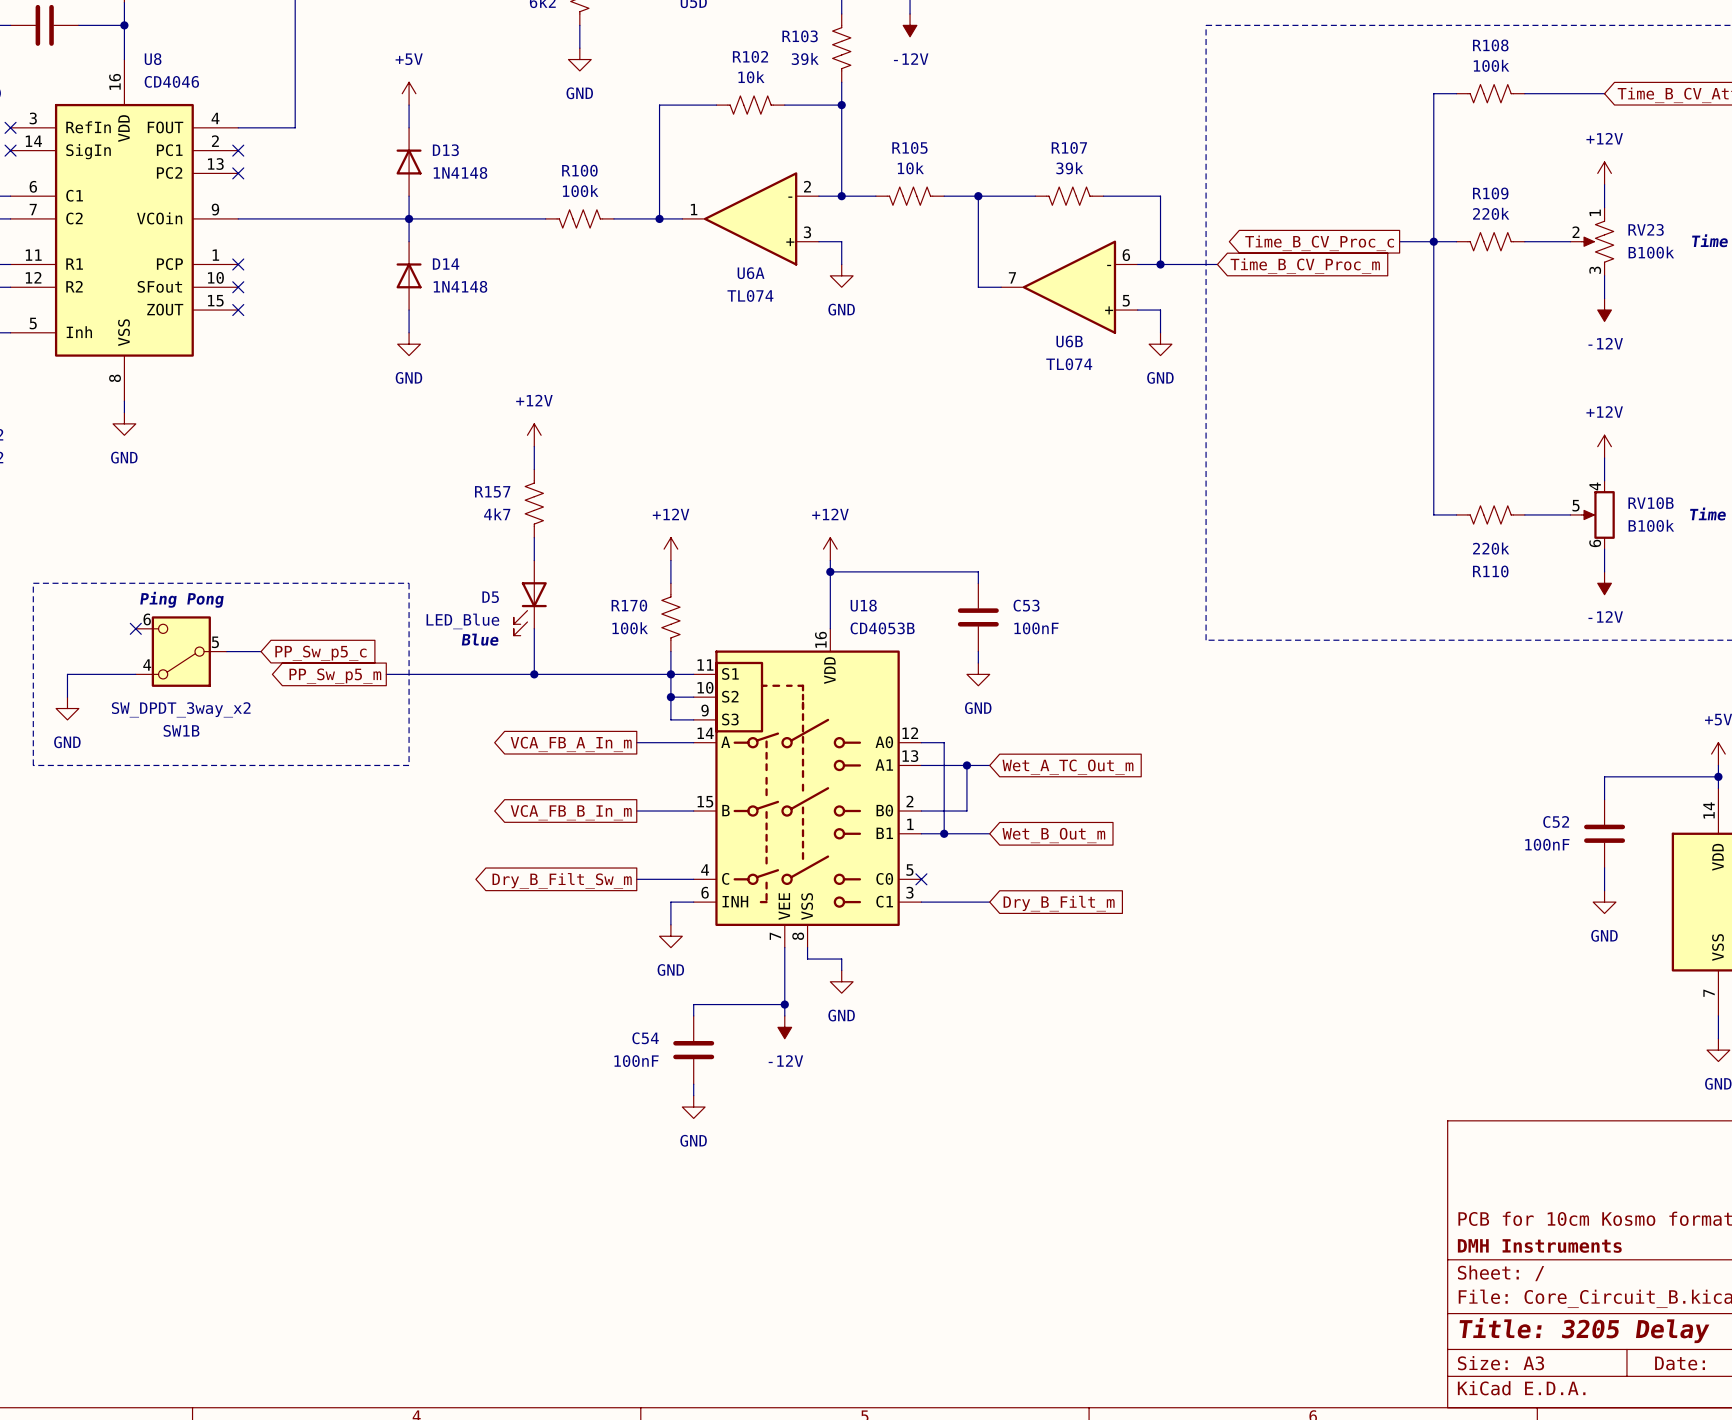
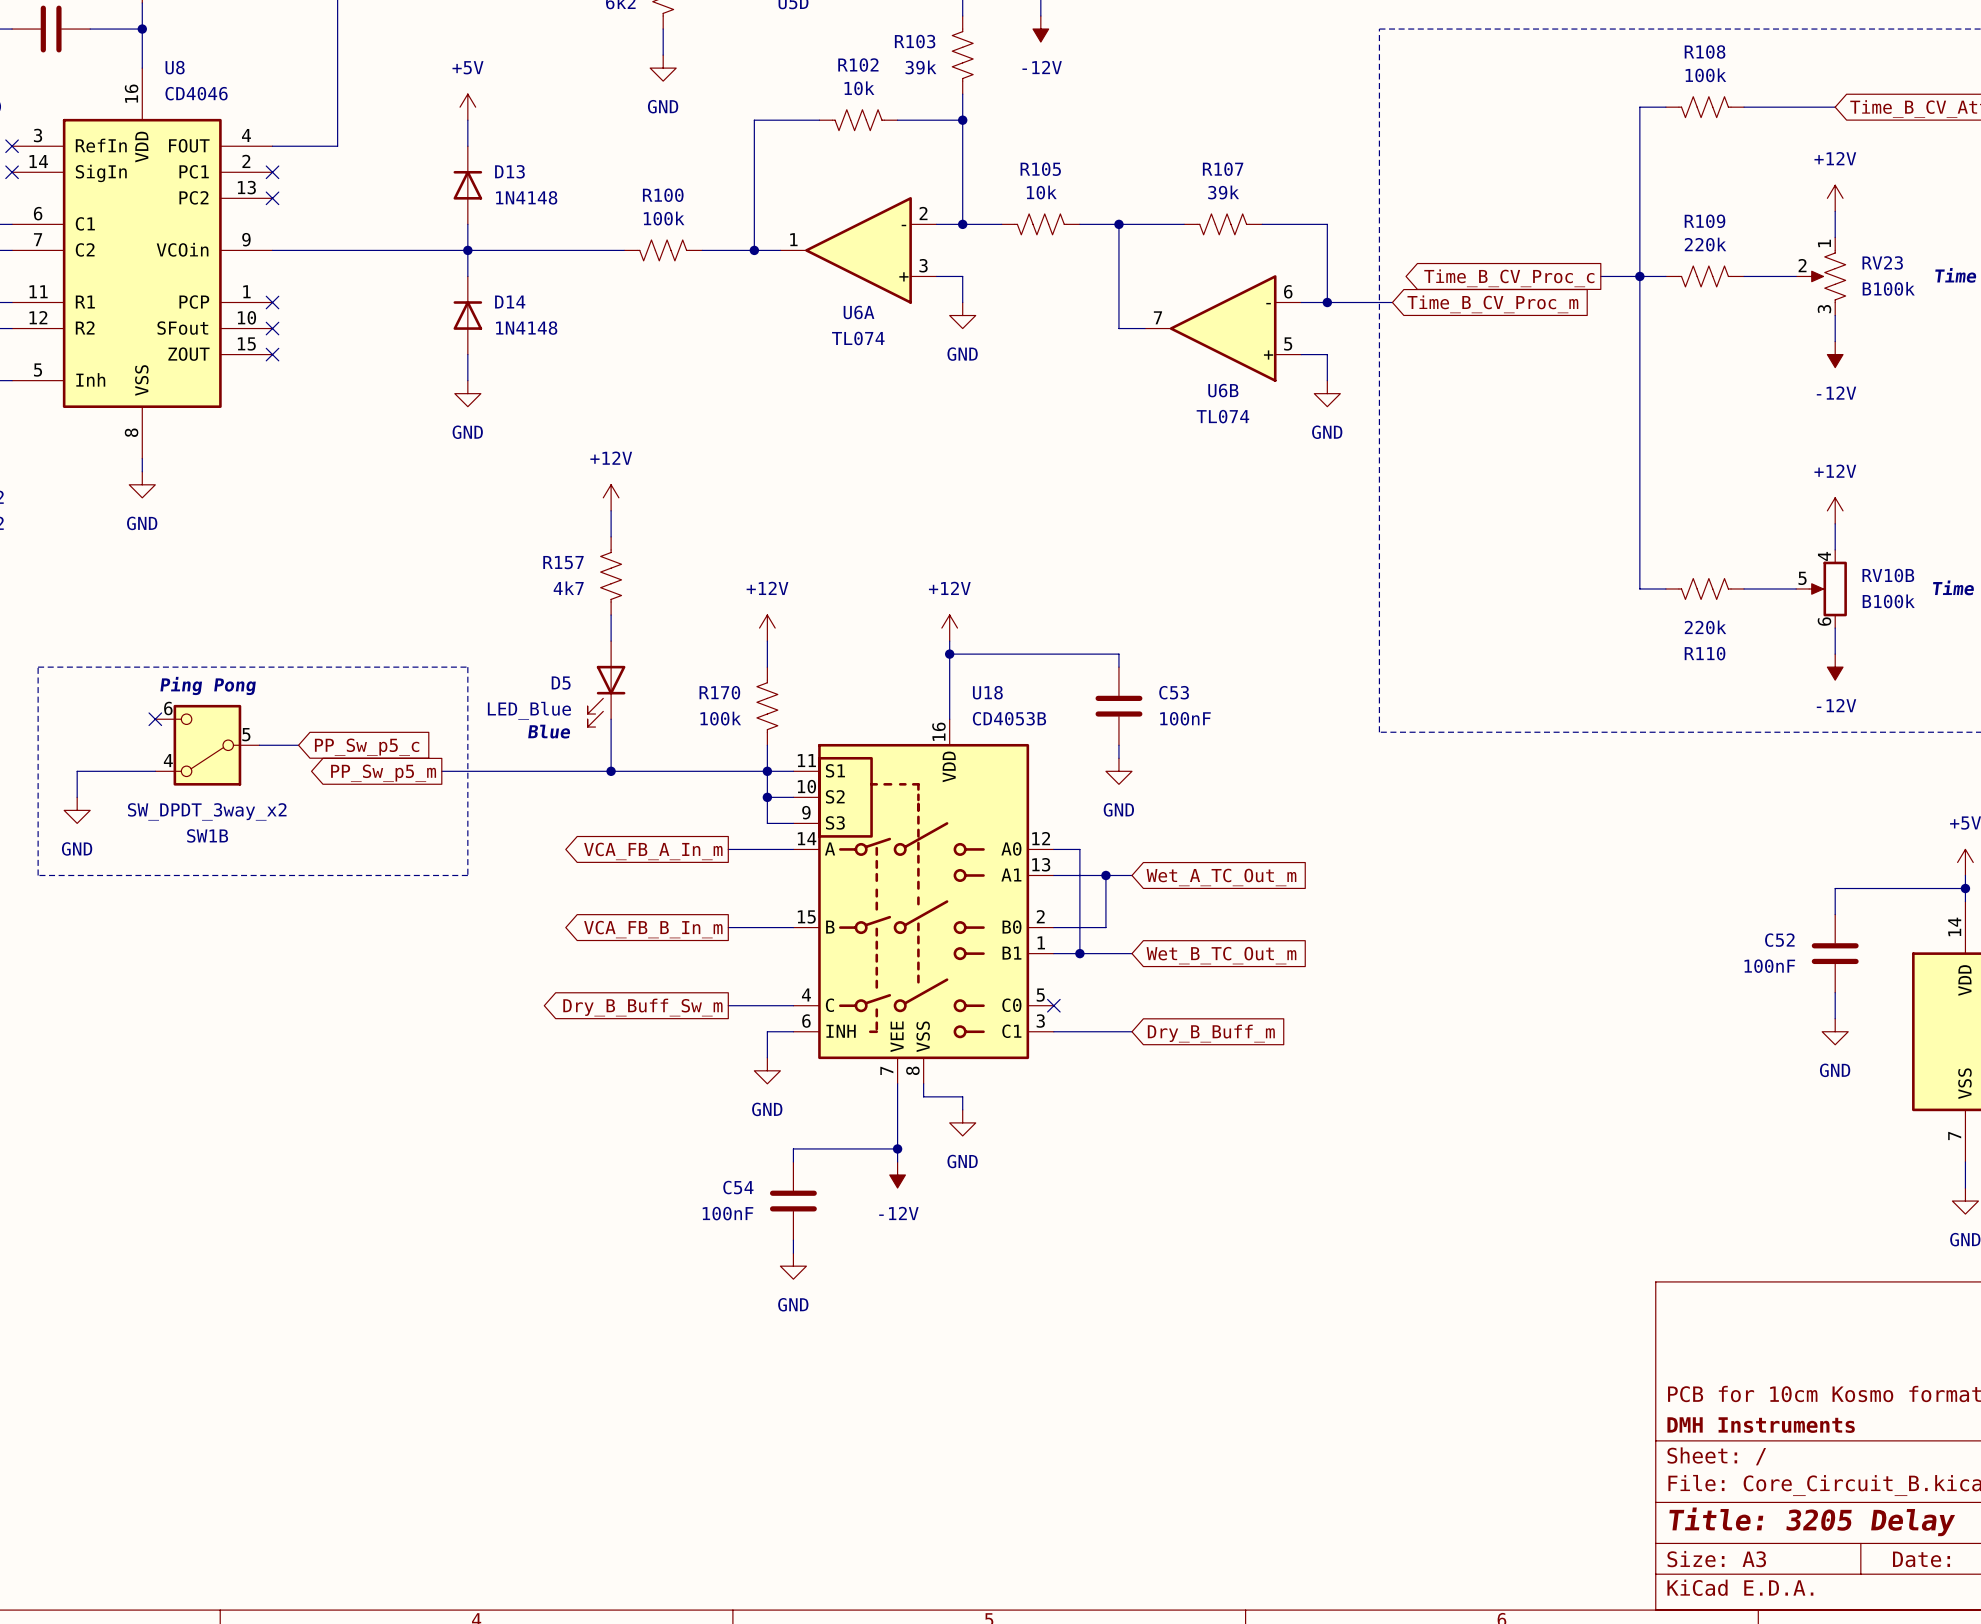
global label: Wet_B_Out_m (1053, 835) -> Wet_B_TC_Out_m (1221, 955)
global label: Dry_B_Filt_Sw_m (562, 880) -> Dry_B_Buff_Sw_m (642, 1007)
global label: Dry_B_Filt_m (1059, 903) -> Dry_B_Buff_m (1211, 1033)

